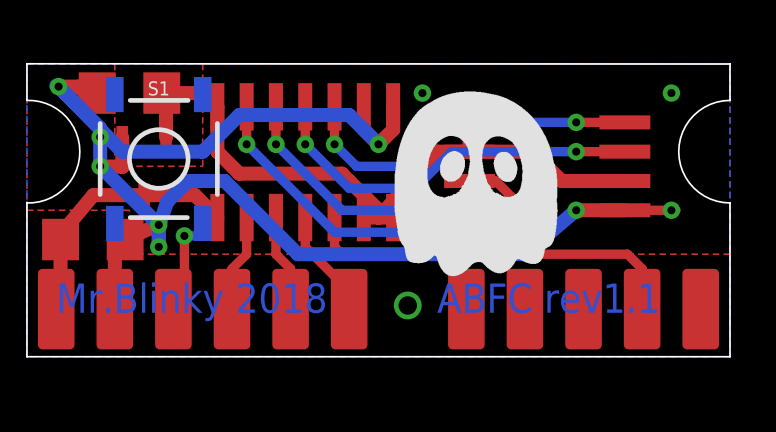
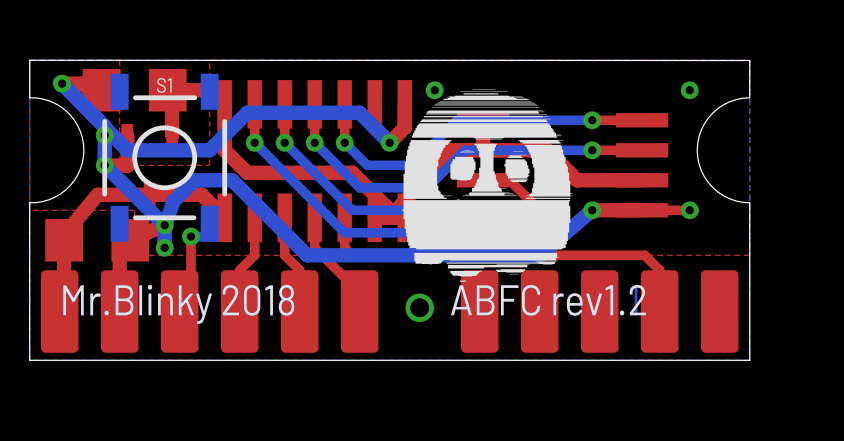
drawing: [394, 91, 558, 277] -> none
drawing: none -> [402, 93, 571, 282]
text: none -> ABFC rev1.2 (548, 300)
text: none -> Mr.Blinky 2018 (178, 304)

